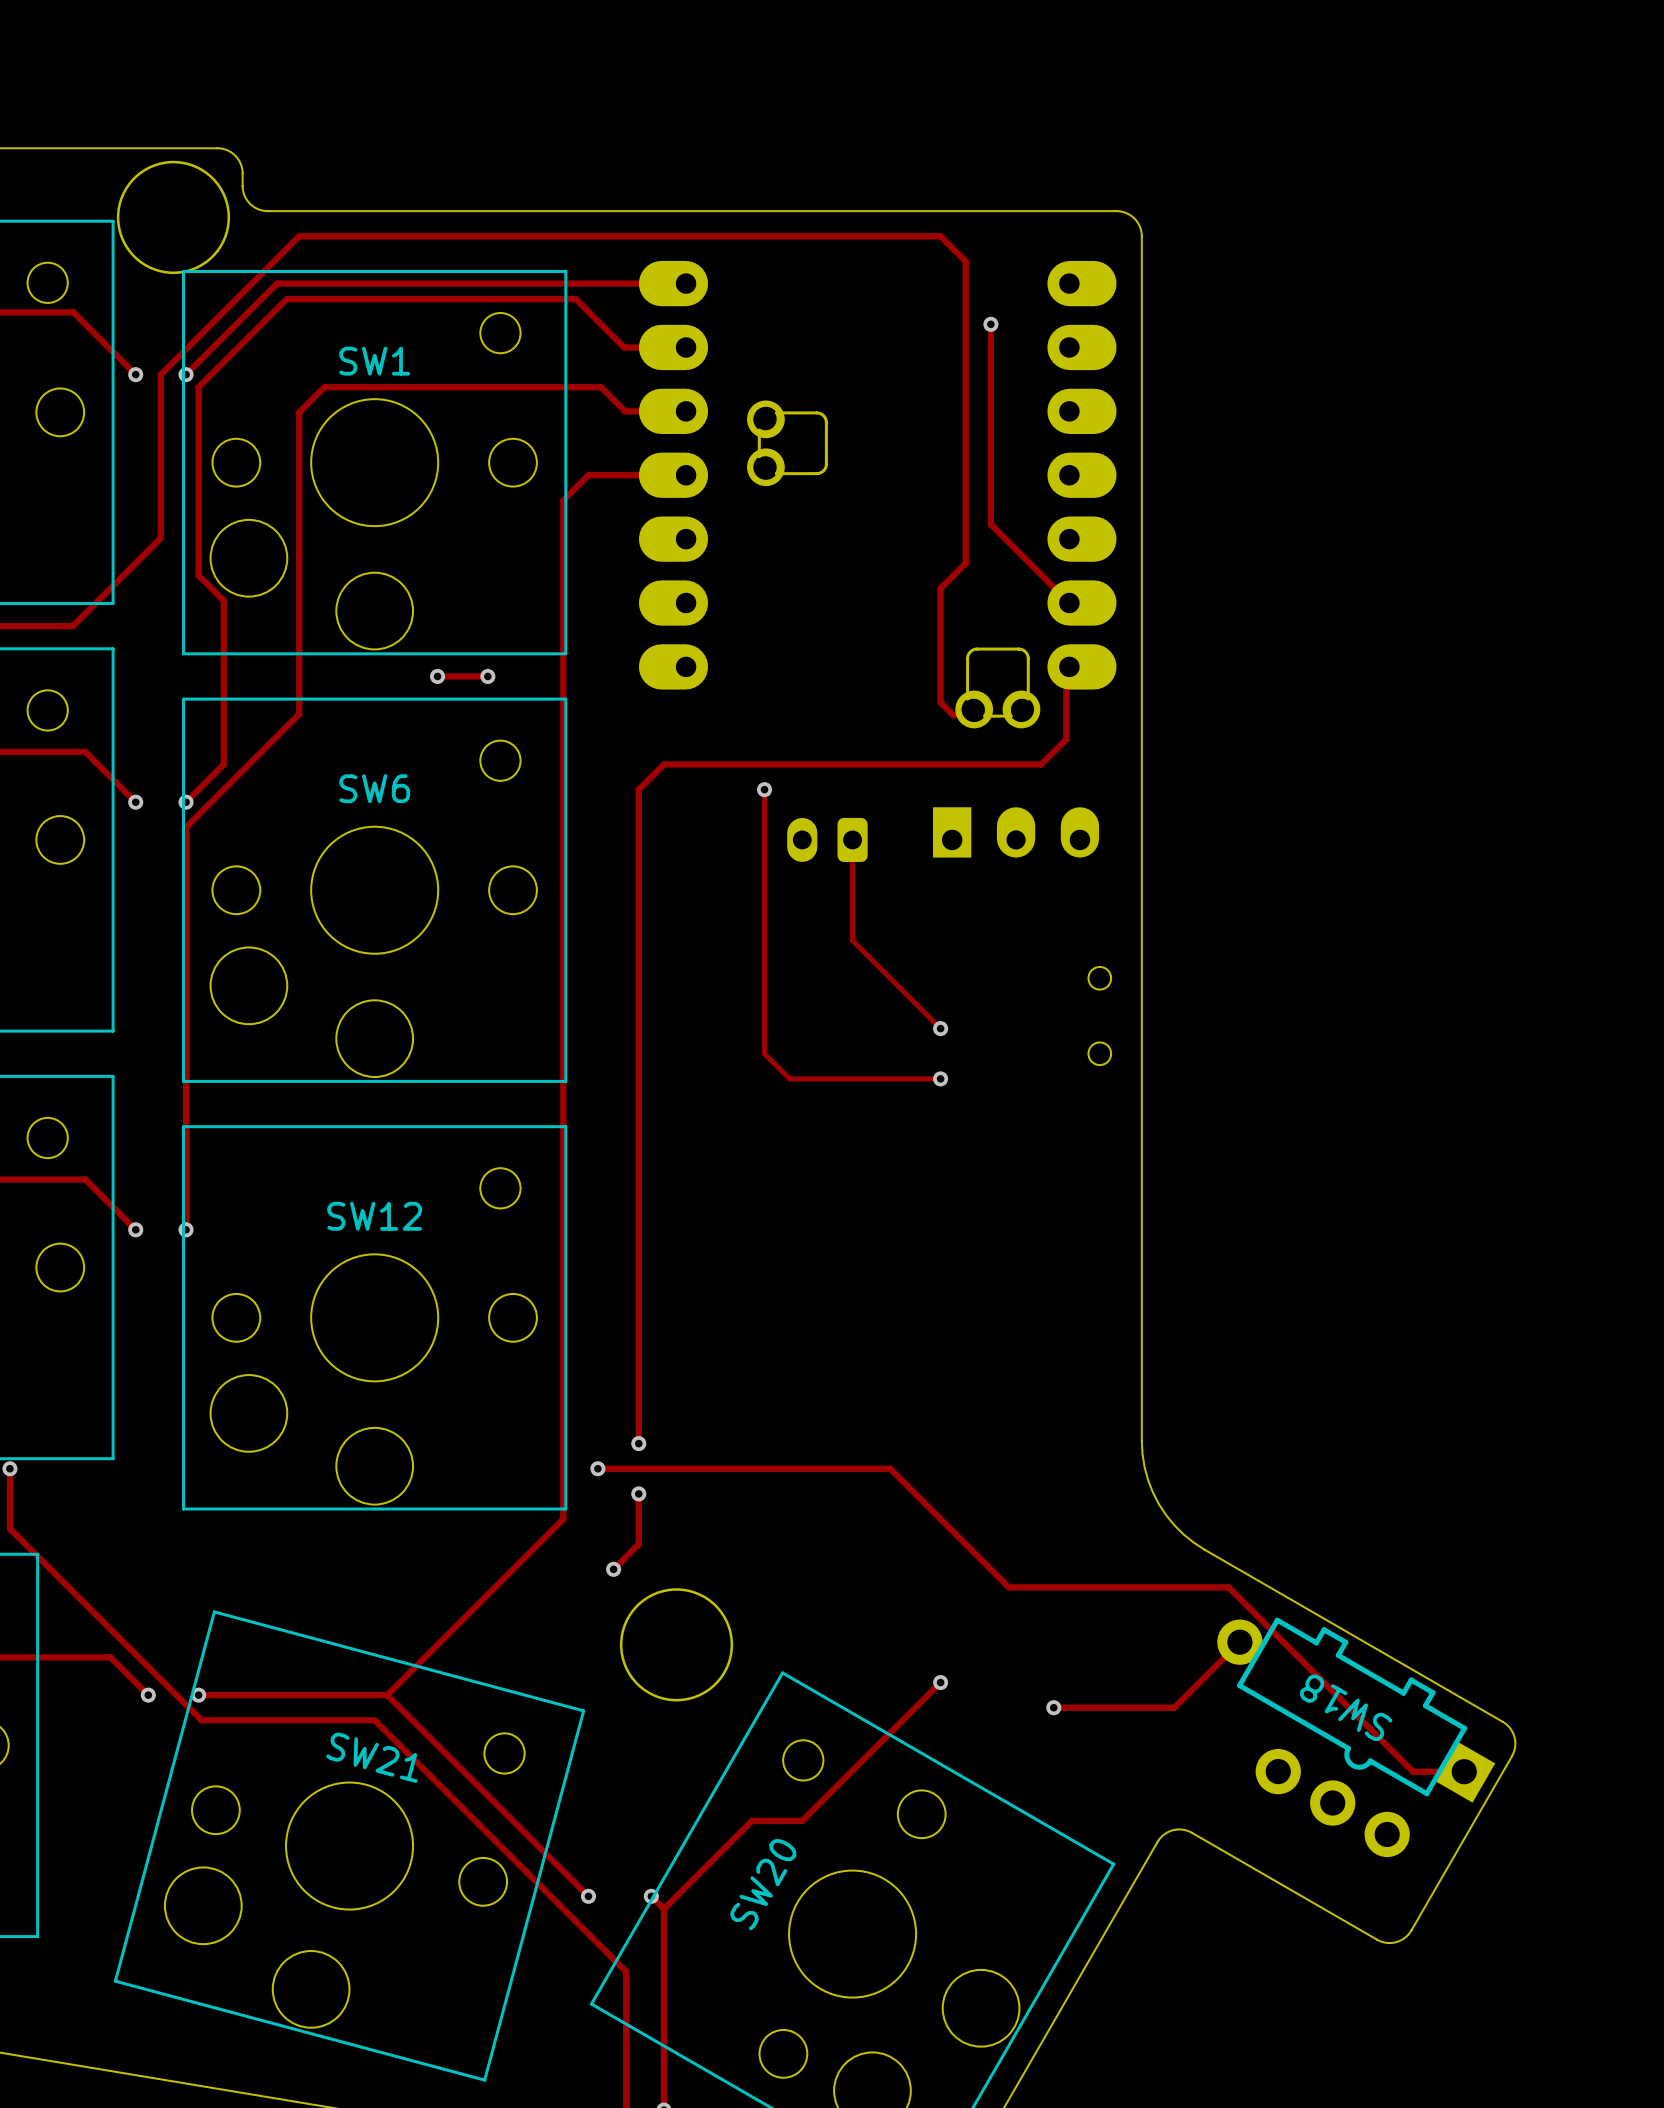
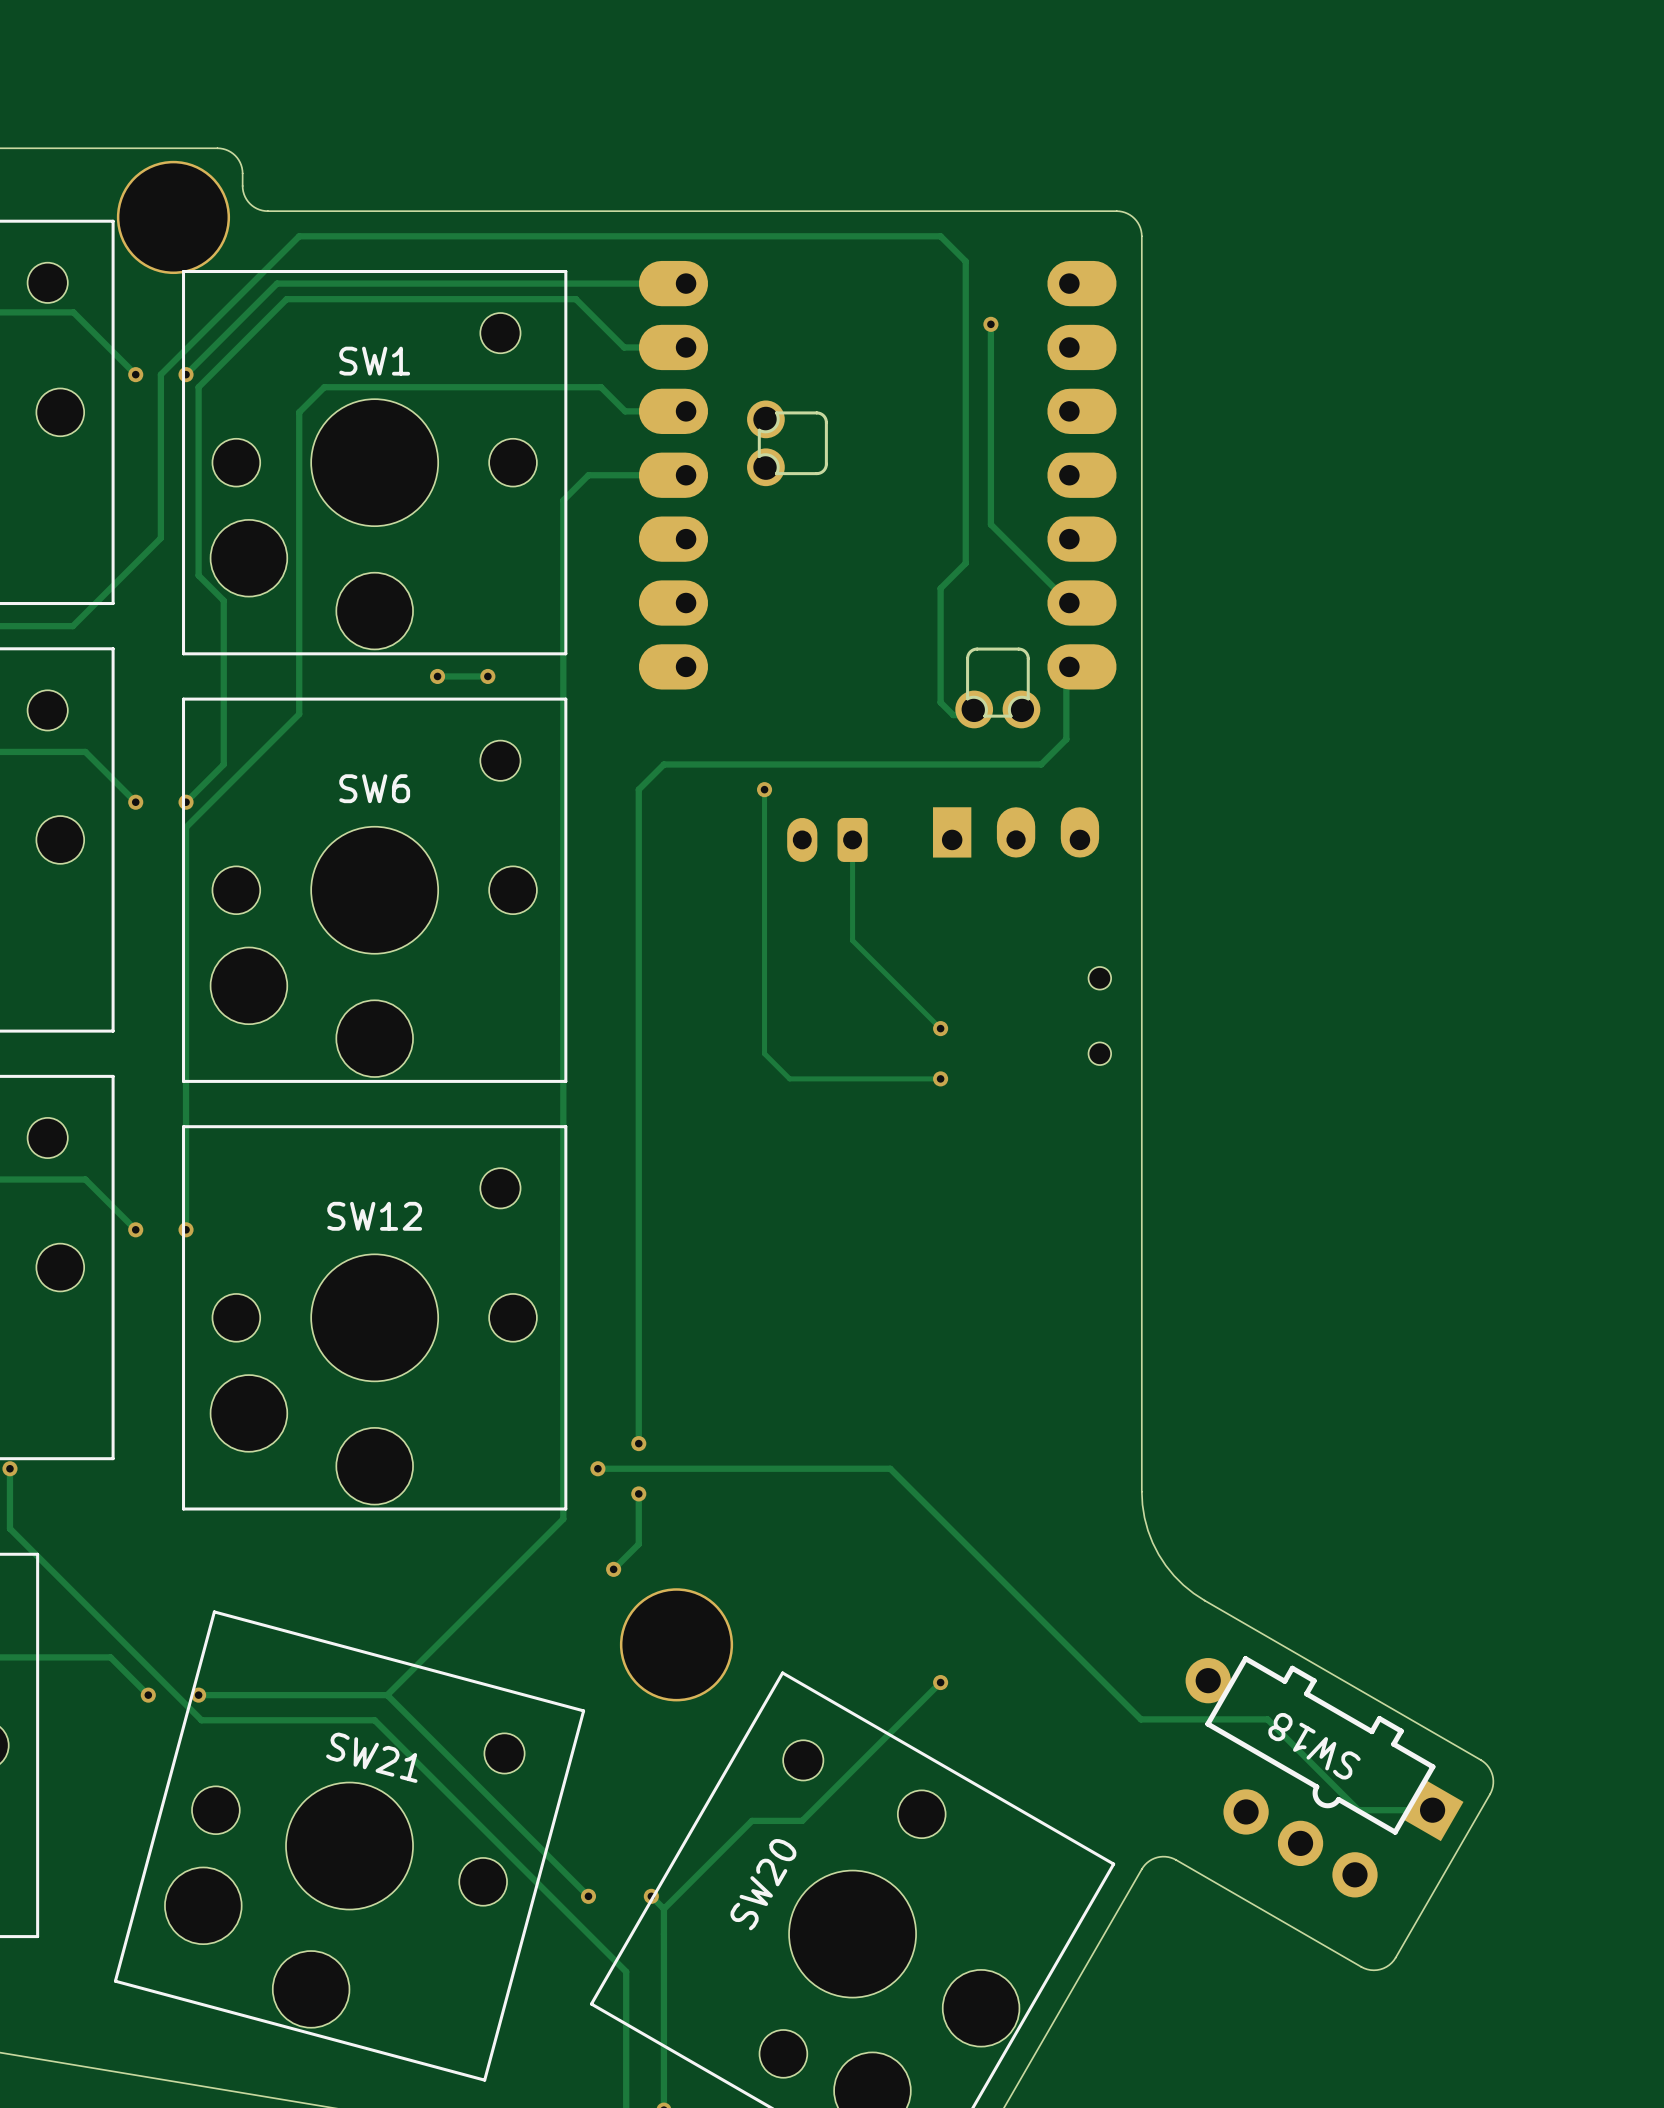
board edge: (1141, 1440) (1147, 1479) (1158, 1503) (1174, 1524) (1193, 1542) (1508, 1725) (1514, 1737) (1514, 1750) (1490, 1794) -> (1141, 1440) (1141, 1491) (1144, 1517) (1152, 1542) (1174, 1575) (1204, 1600) (1483, 1761) (1492, 1775) (1493, 1783) (1490, 1794)
track: (1008, 1587) (1228, 1587) (1413, 1771) (1464, 1771) -> (1008, 1587) (1140, 1719) (1267, 1719) (1358, 1810) (1432, 1810)
track: (1239, 1642) (1174, 1707) (1053, 1707) -> none
via: (1053, 1707) -> none
SW18 position: (1356, 1710) -> (1324, 1748)
part position: (1332, 1803) -> (1300, 1843)
board edge: (1141, 1869) (1161, 1836) (1172, 1830) (1185, 1830) (1379, 1940) (1387, 1942) (1398, 1941) (1411, 1930) -> (1141, 1869) (1149, 1861) (1157, 1857) (1173, 1858) (1367, 1969) (1380, 1969) (1391, 1962) (1411, 1930)

